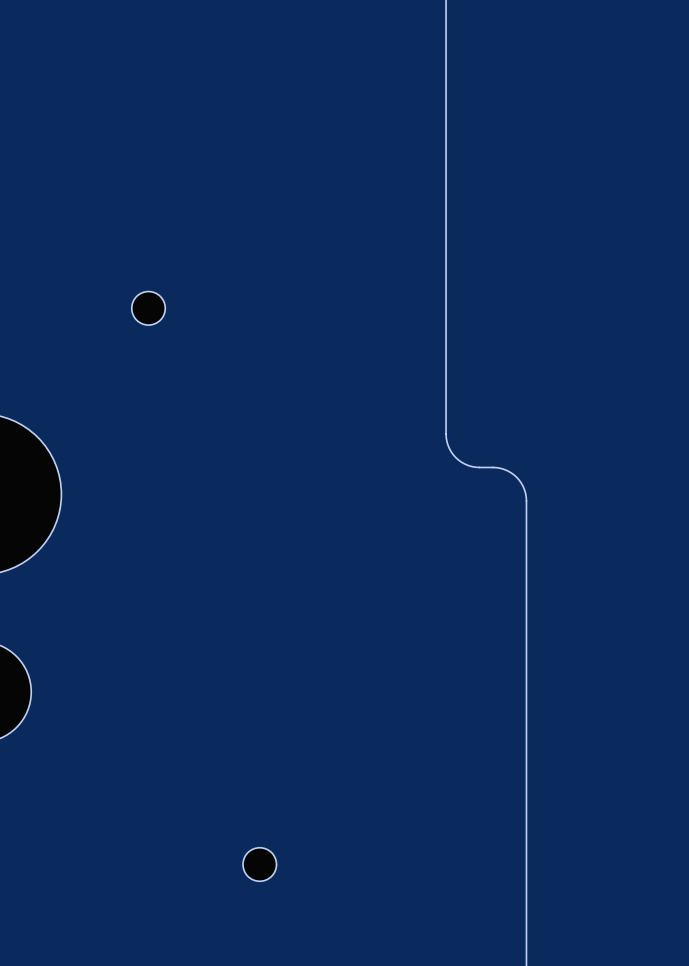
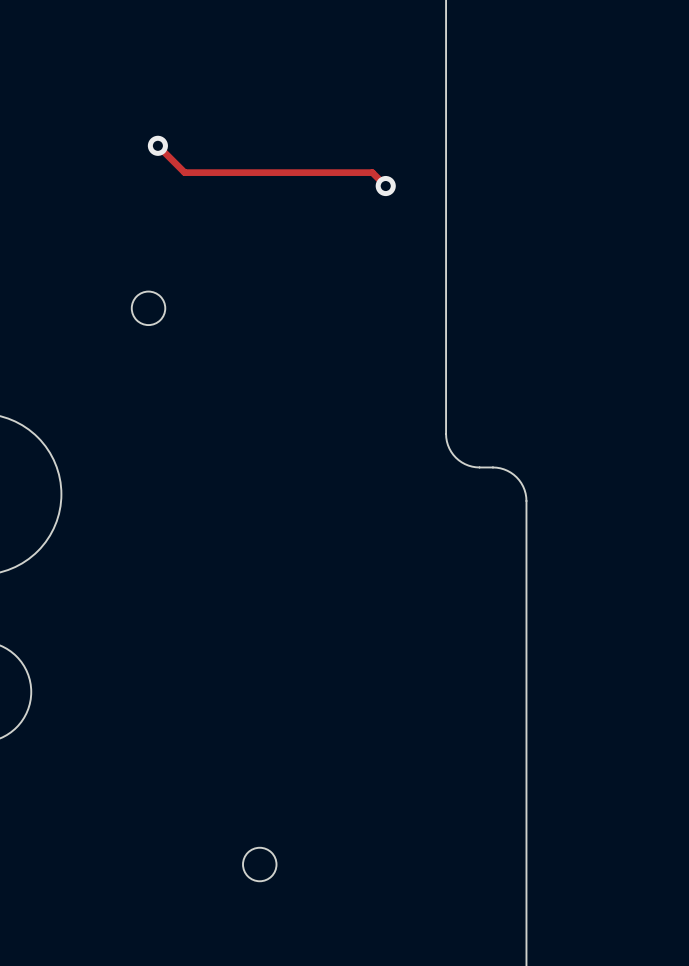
track: none -> (157, 145) (184, 172) (372, 172) (385, 186)
via: none -> (157, 145)
via: none -> (385, 186)

